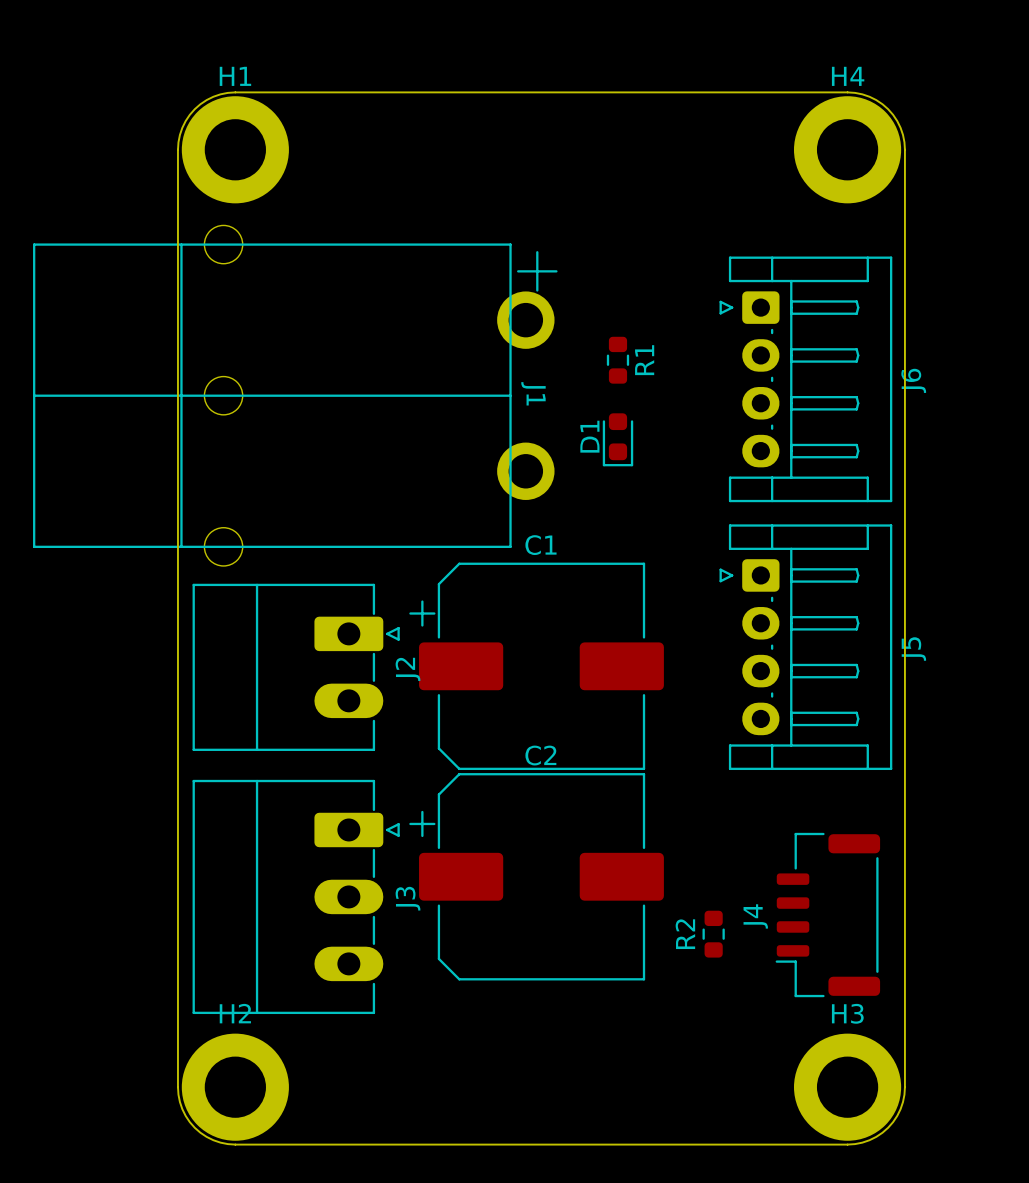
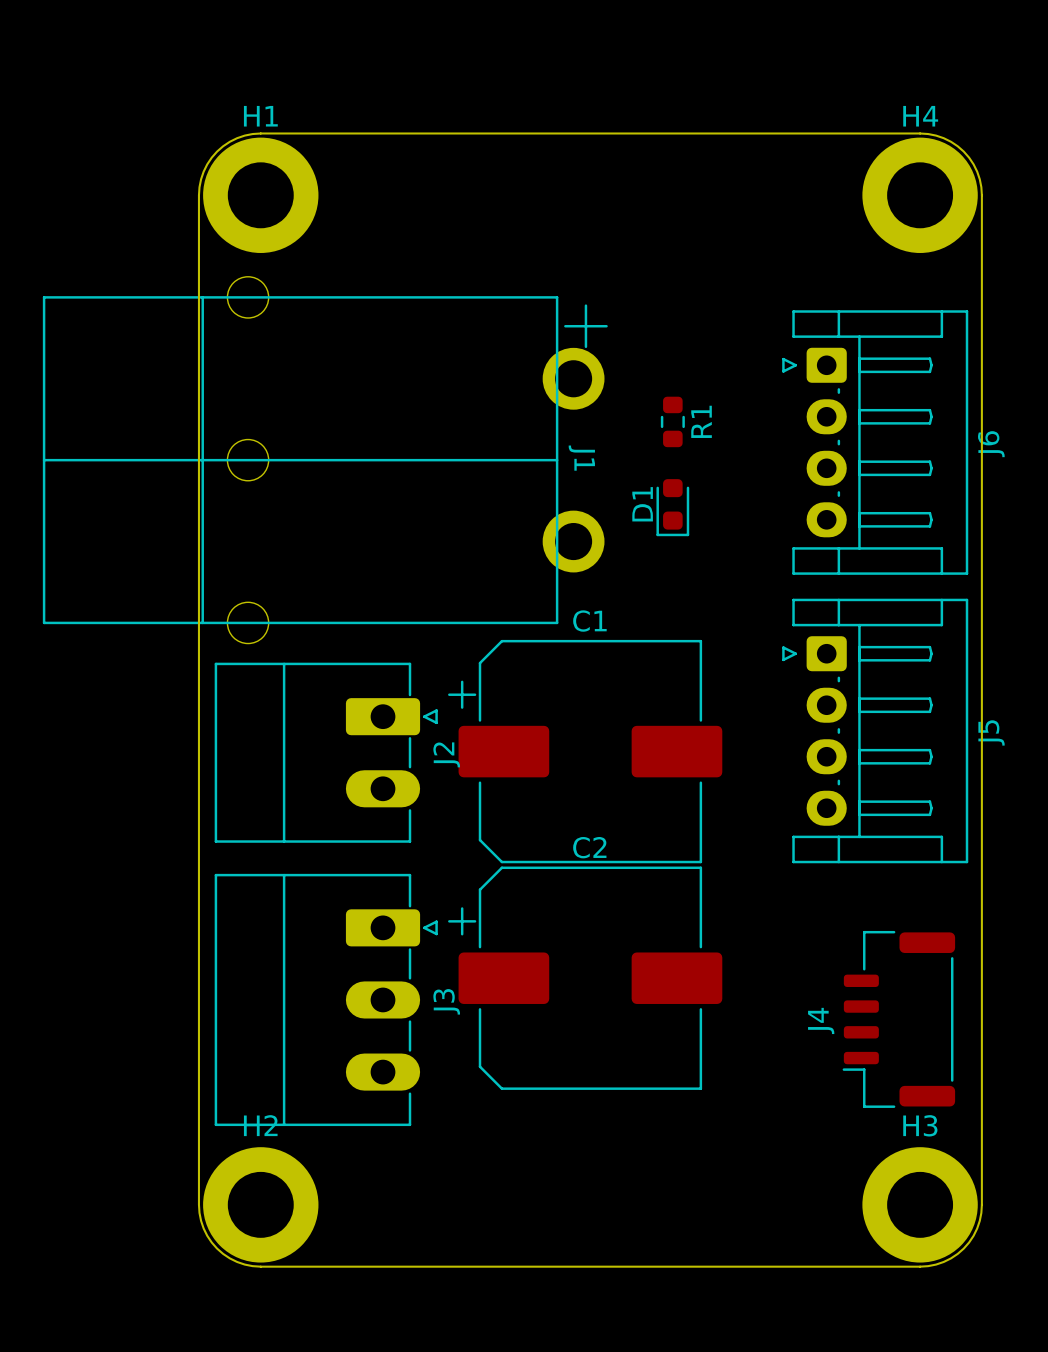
R2: (713, 934) -> none

